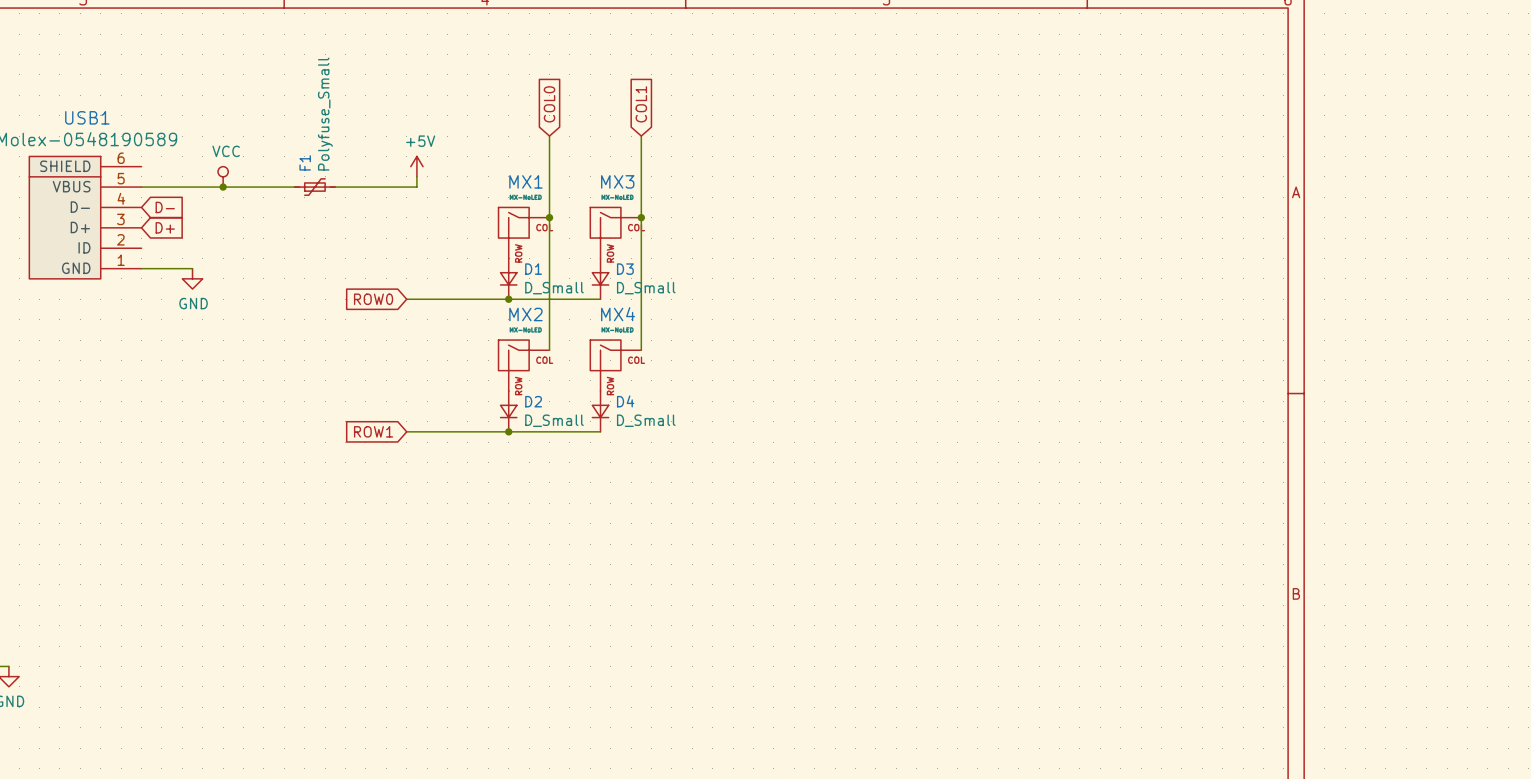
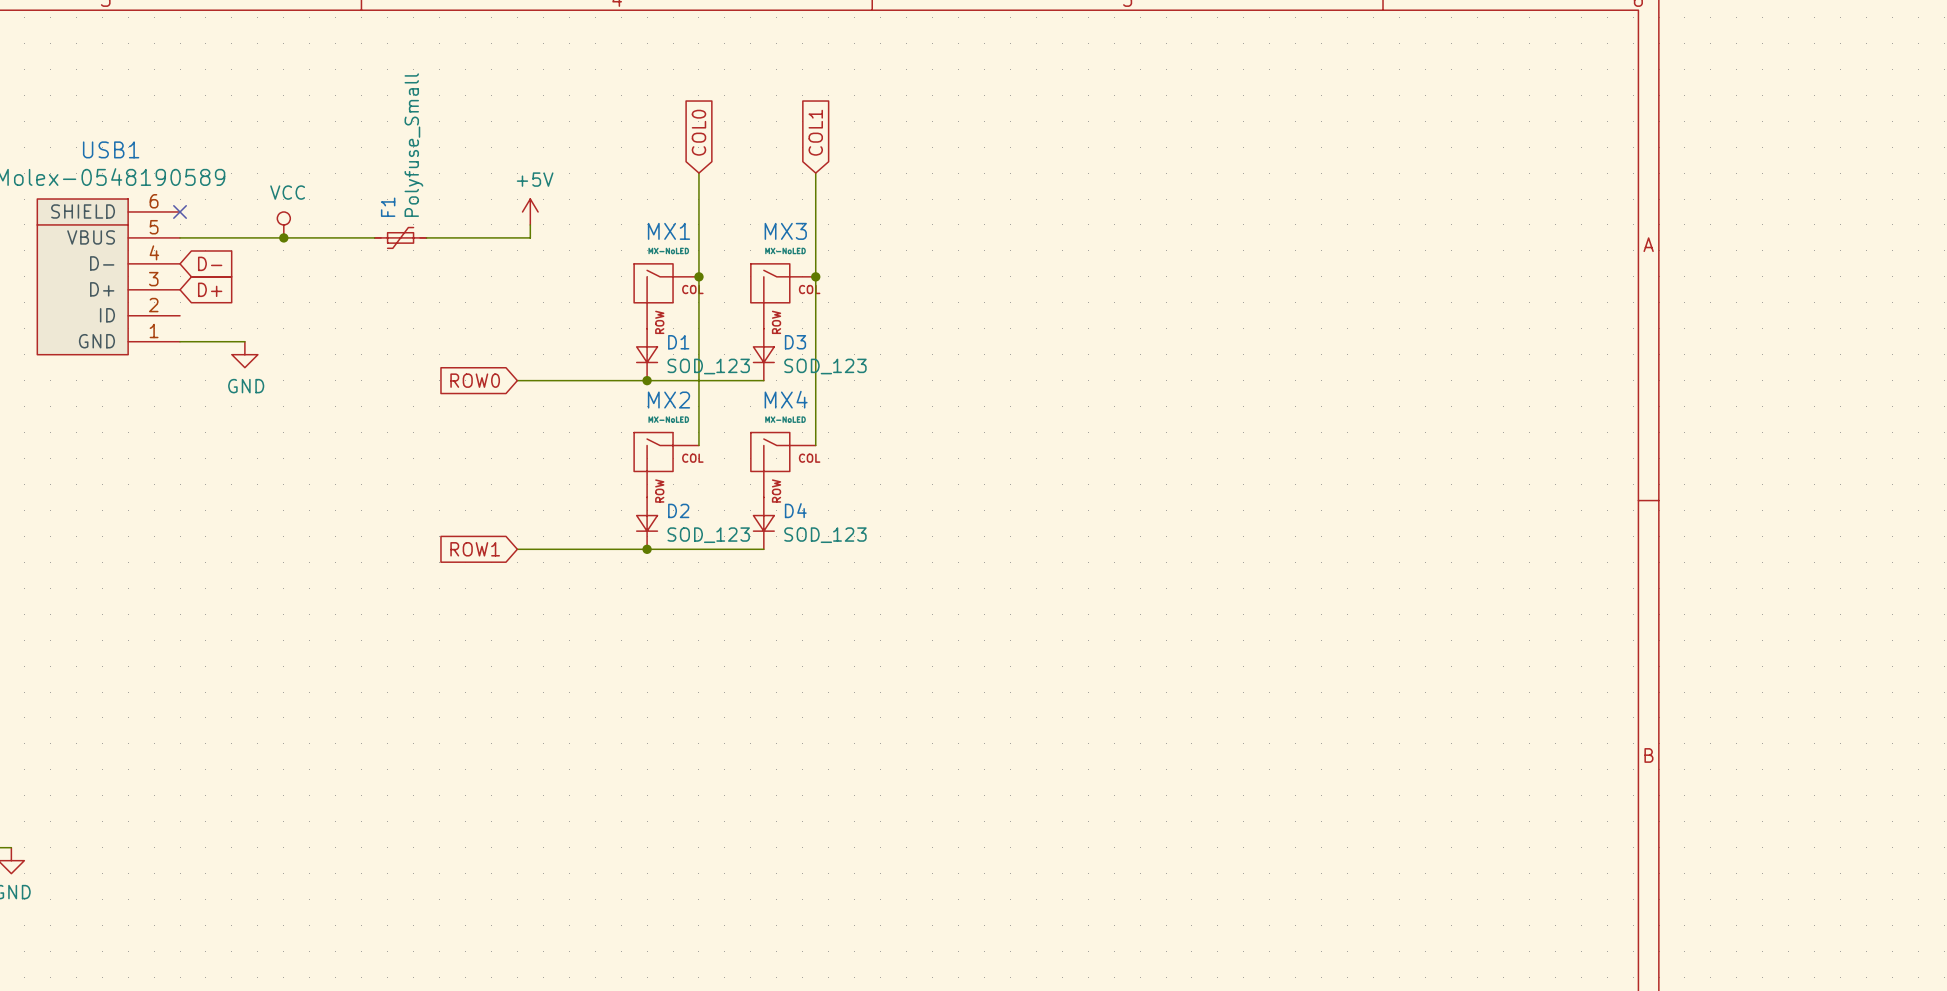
no-connect mark: none -> (180, 211)
D1 value: D_Small (554, 288) -> SOD_123 (708, 366)
D3 value: D_Small (646, 288) -> SOD_123 (825, 366)
D2 value: D_Small (554, 420) -> SOD_123 (708, 535)
D4 value: D_Small (646, 420) -> SOD_123 (825, 535)

